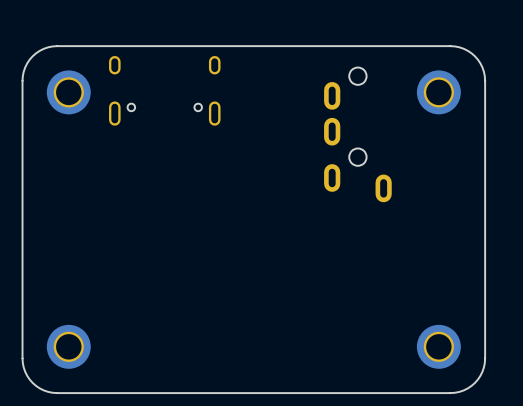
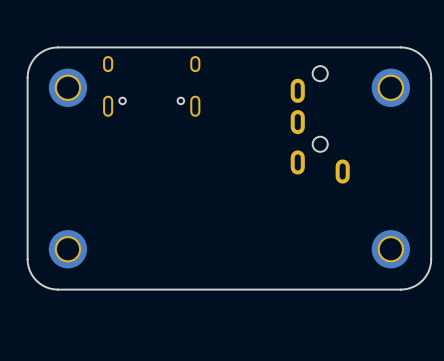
board edge: (485, 289) (483, 367) (480, 375) (471, 385) (459, 391) (450, 393) (48, 391) (32, 382) (23, 367) (22, 289) -> (431, 259) (428, 270) (422, 280) (412, 287) (400, 289) (53, 289) (42, 285) (33, 277) (29, 270) (27, 259)
part position: (68, 346) -> (67, 249)
part position: (438, 346) -> (390, 249)

